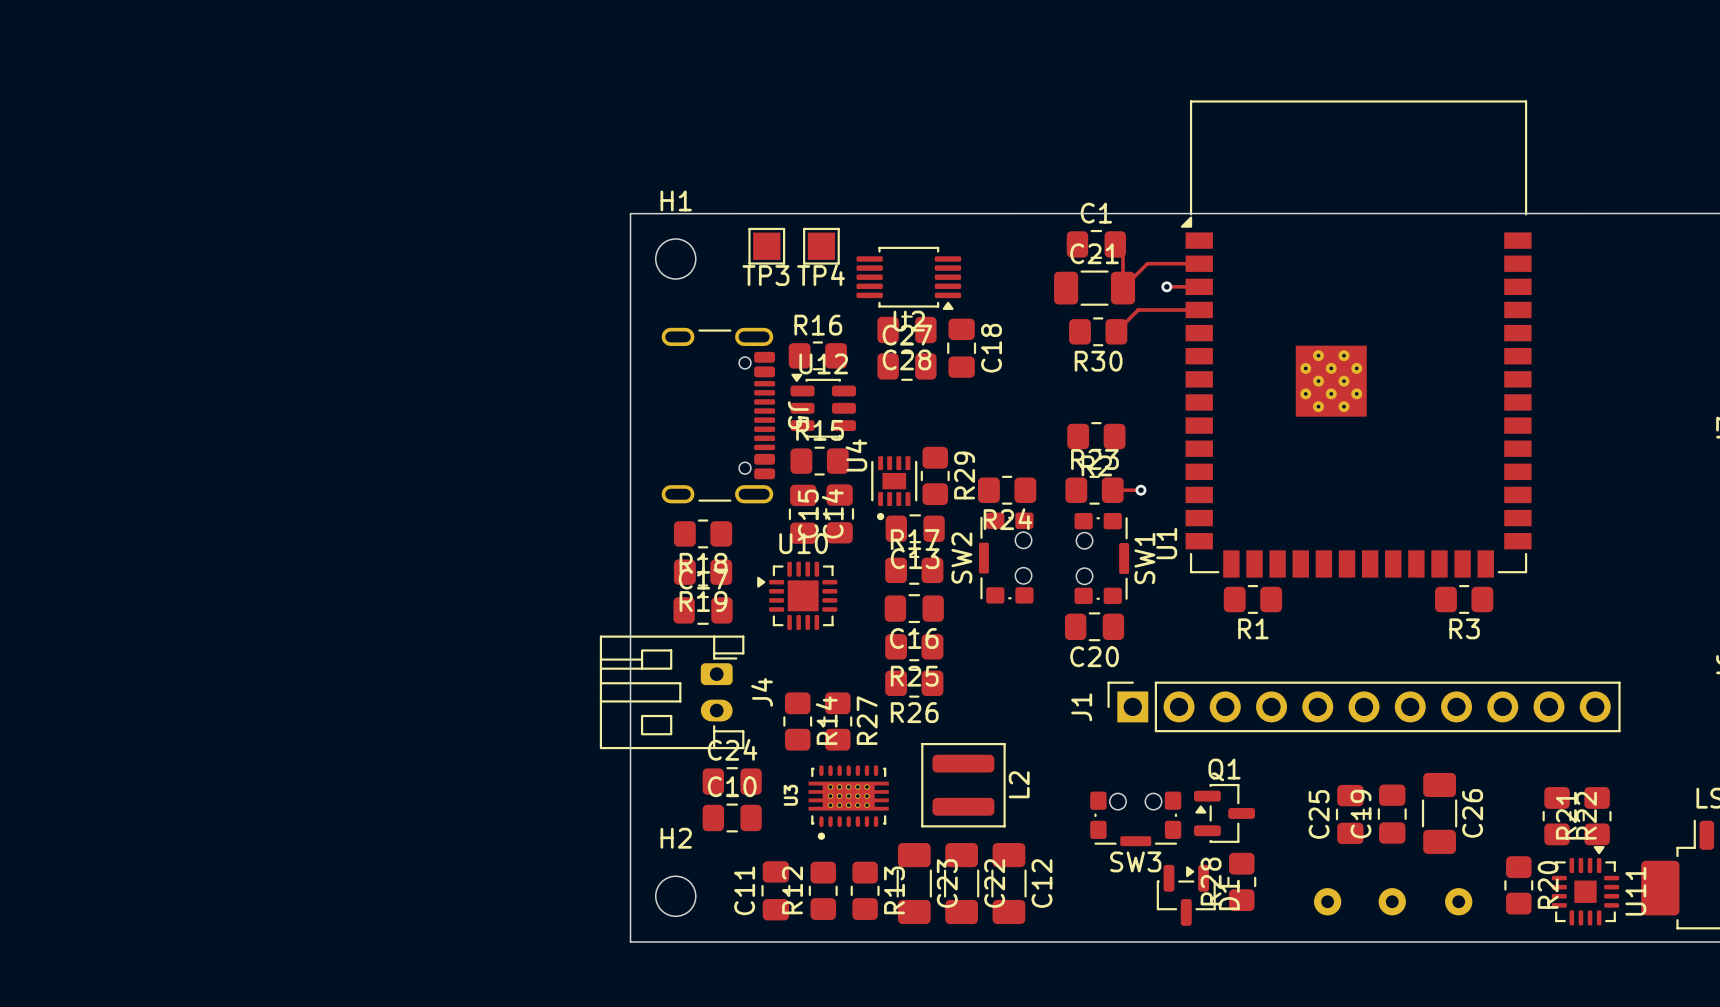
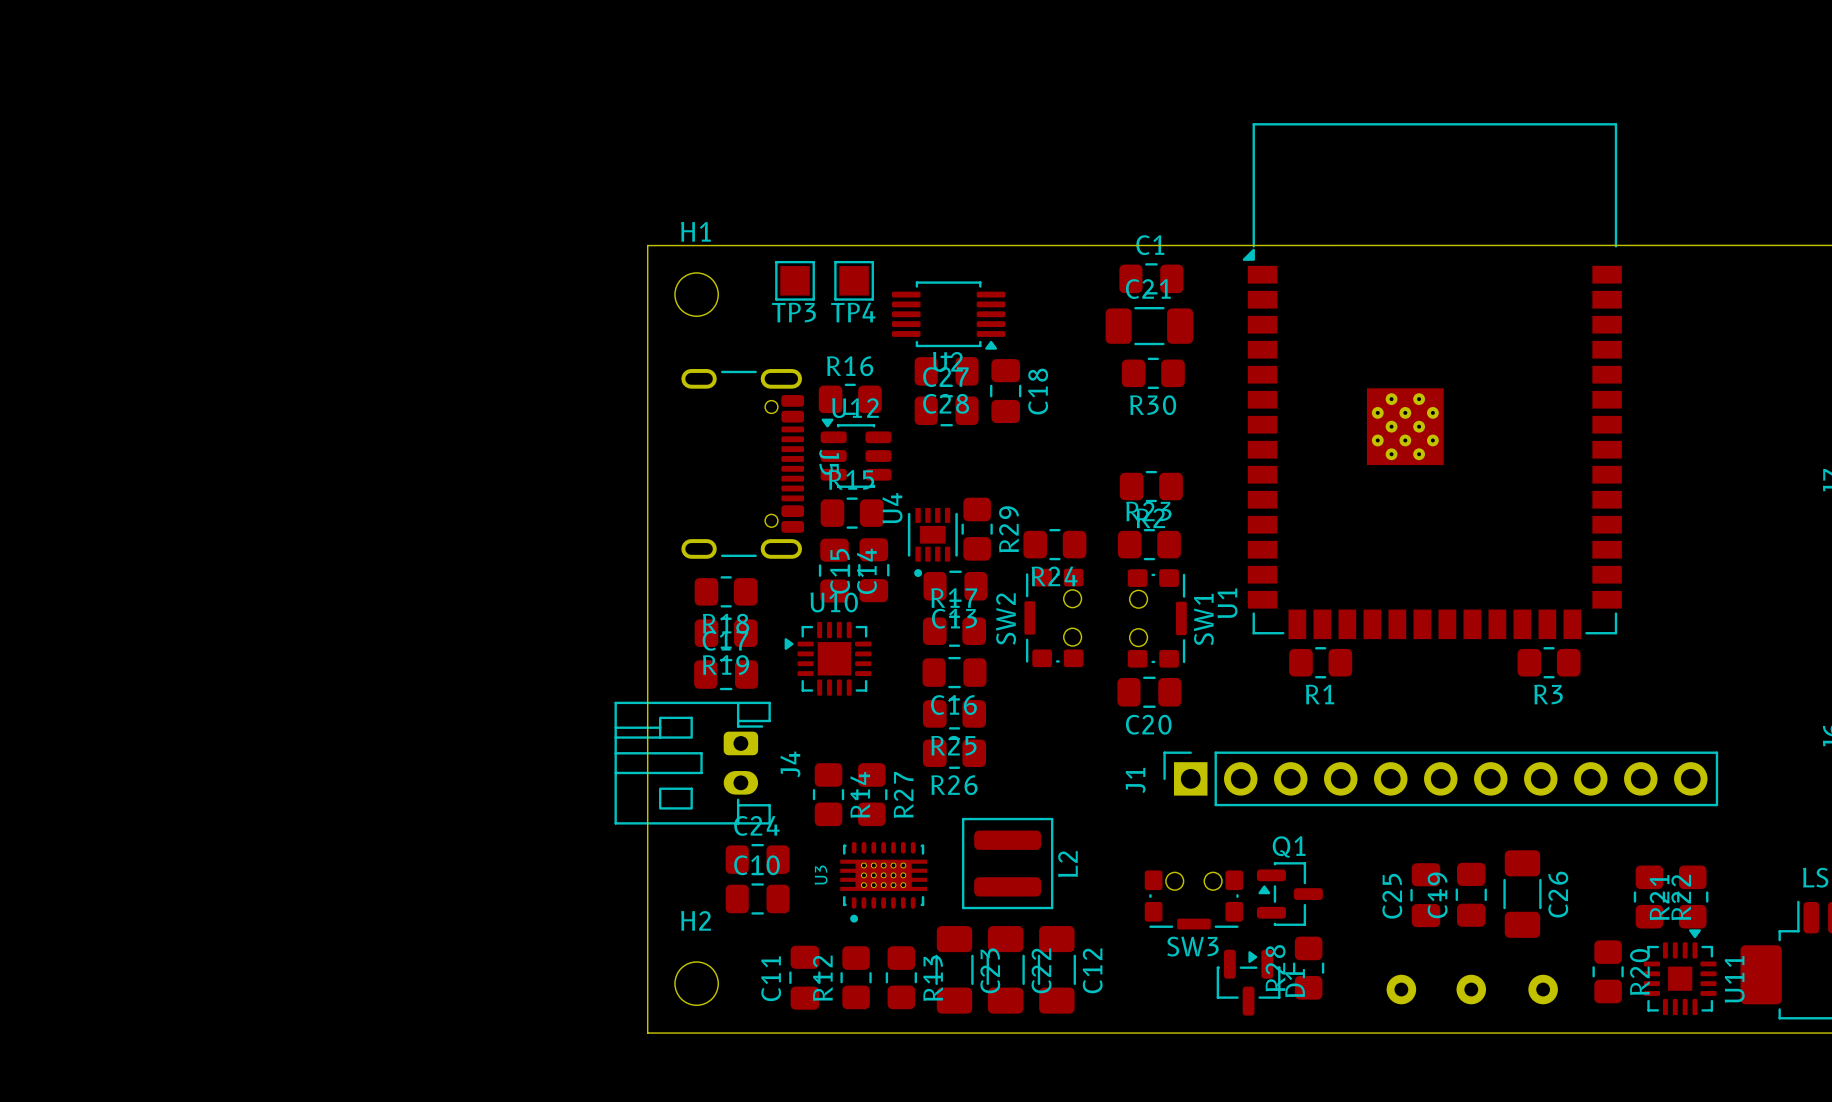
track: (1115, 244) (1122, 252) (1122, 288) (1147, 263) (1199, 263) -> none
track: (1166, 286) (1199, 286) -> none
via: (1166, 286) -> none
track: (1199, 309) (1138, 309) (1116, 331) -> none
track: (1112, 490) (1140, 490) -> none
via: (1140, 490) -> none

